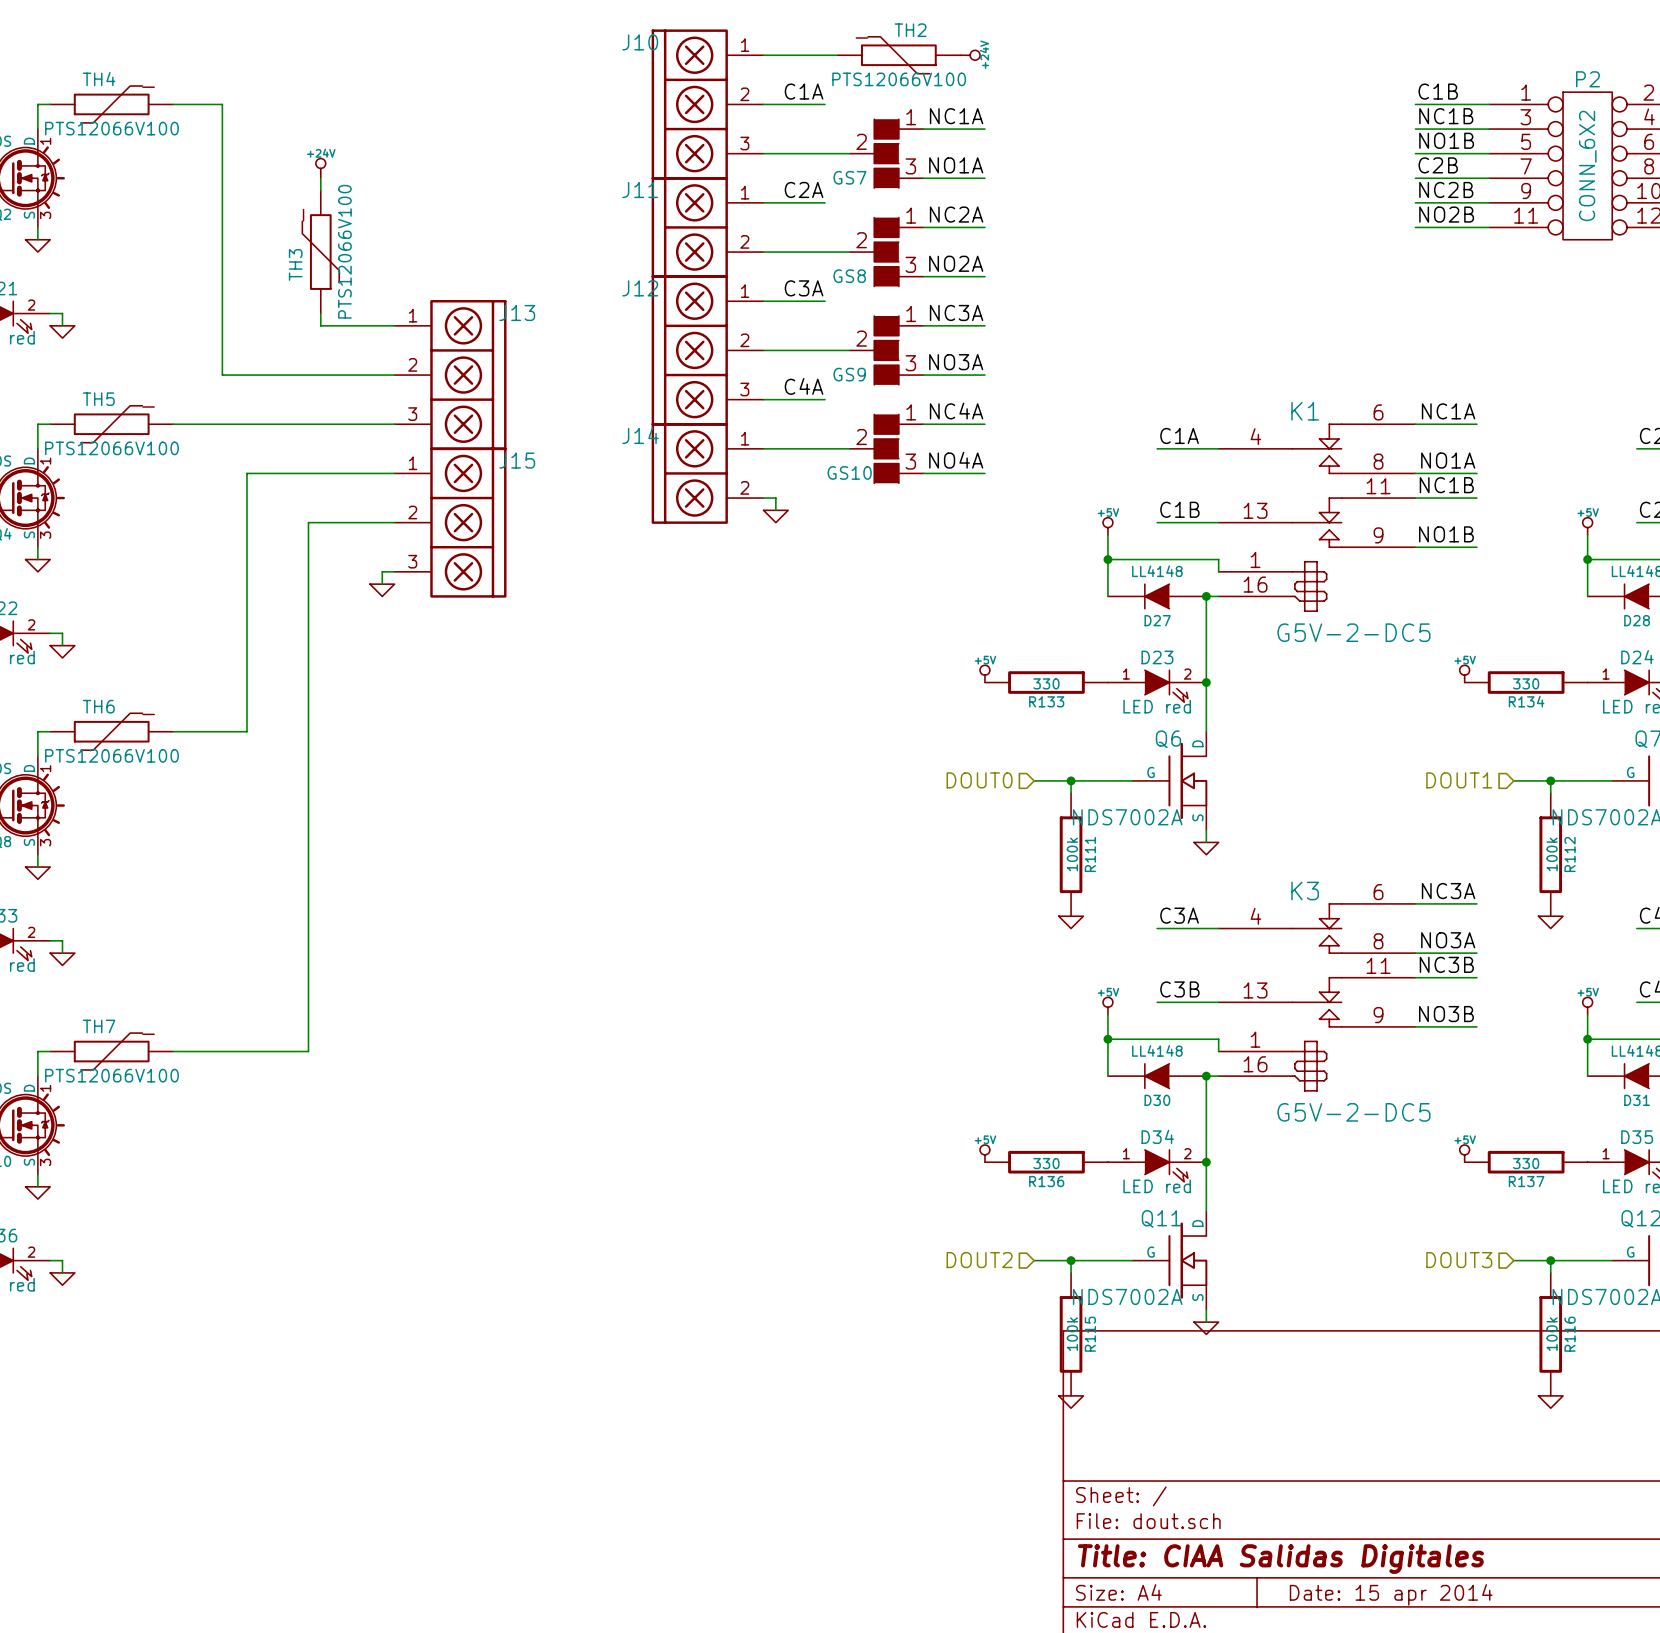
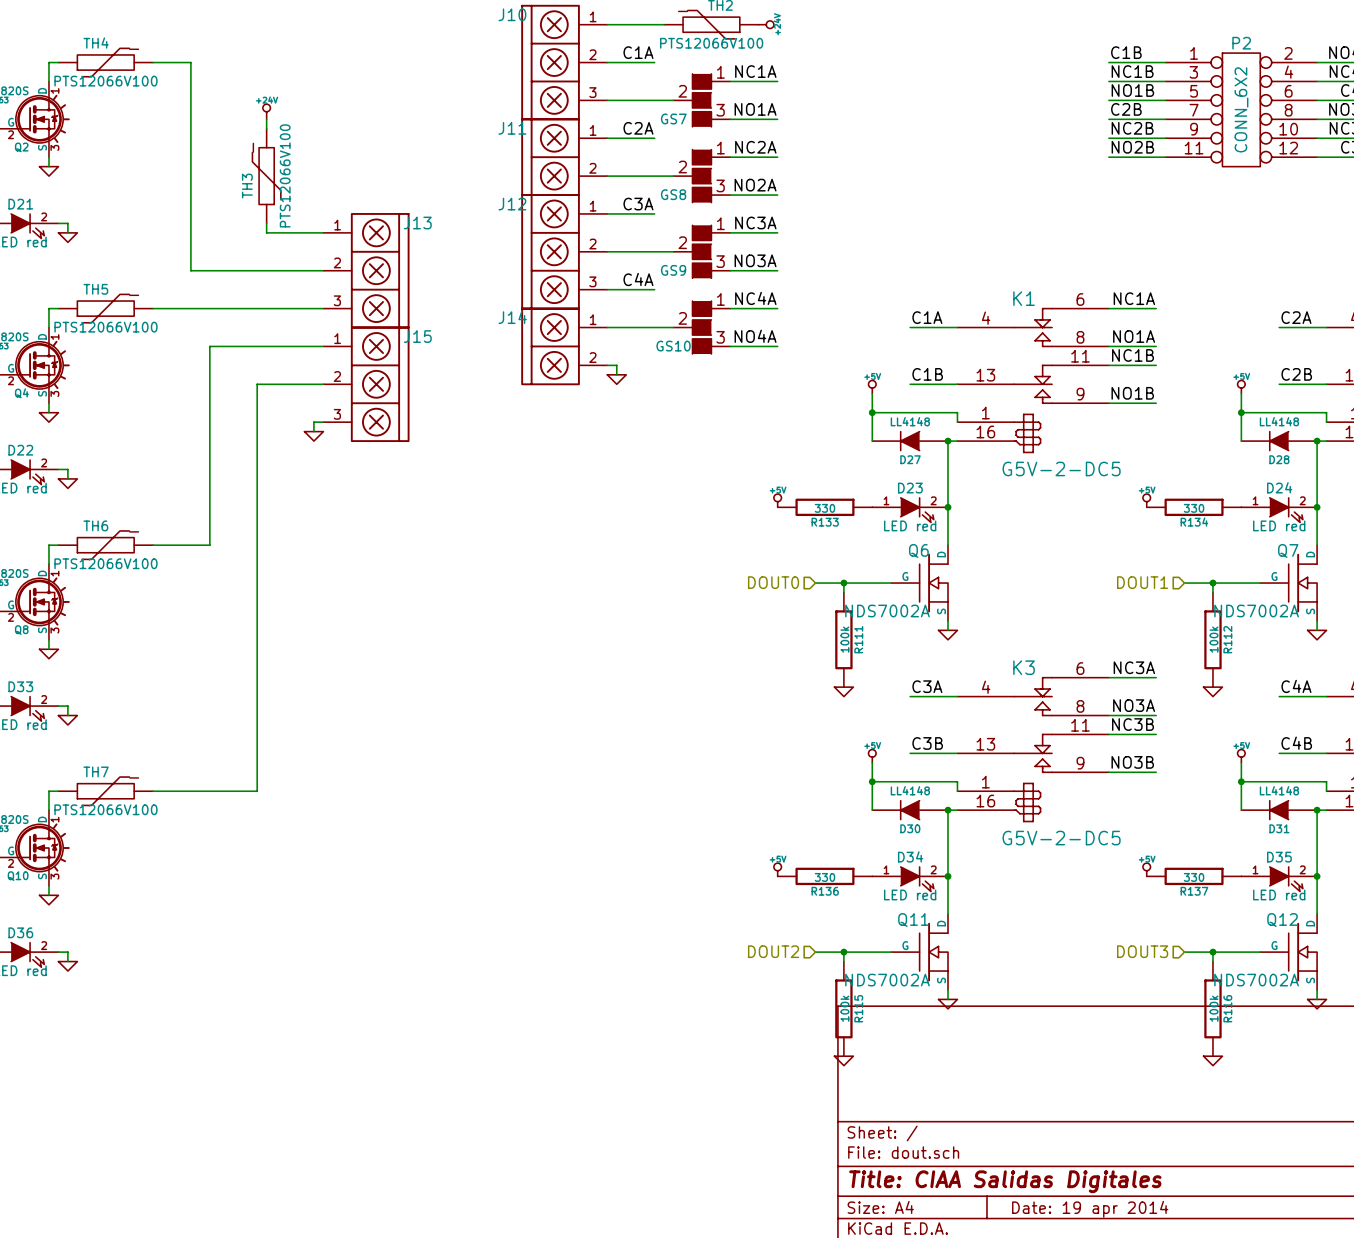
title block: Date: 15 apr 2014 (1391, 1594) -> Date: 19 apr 2014 (1090, 1209)

